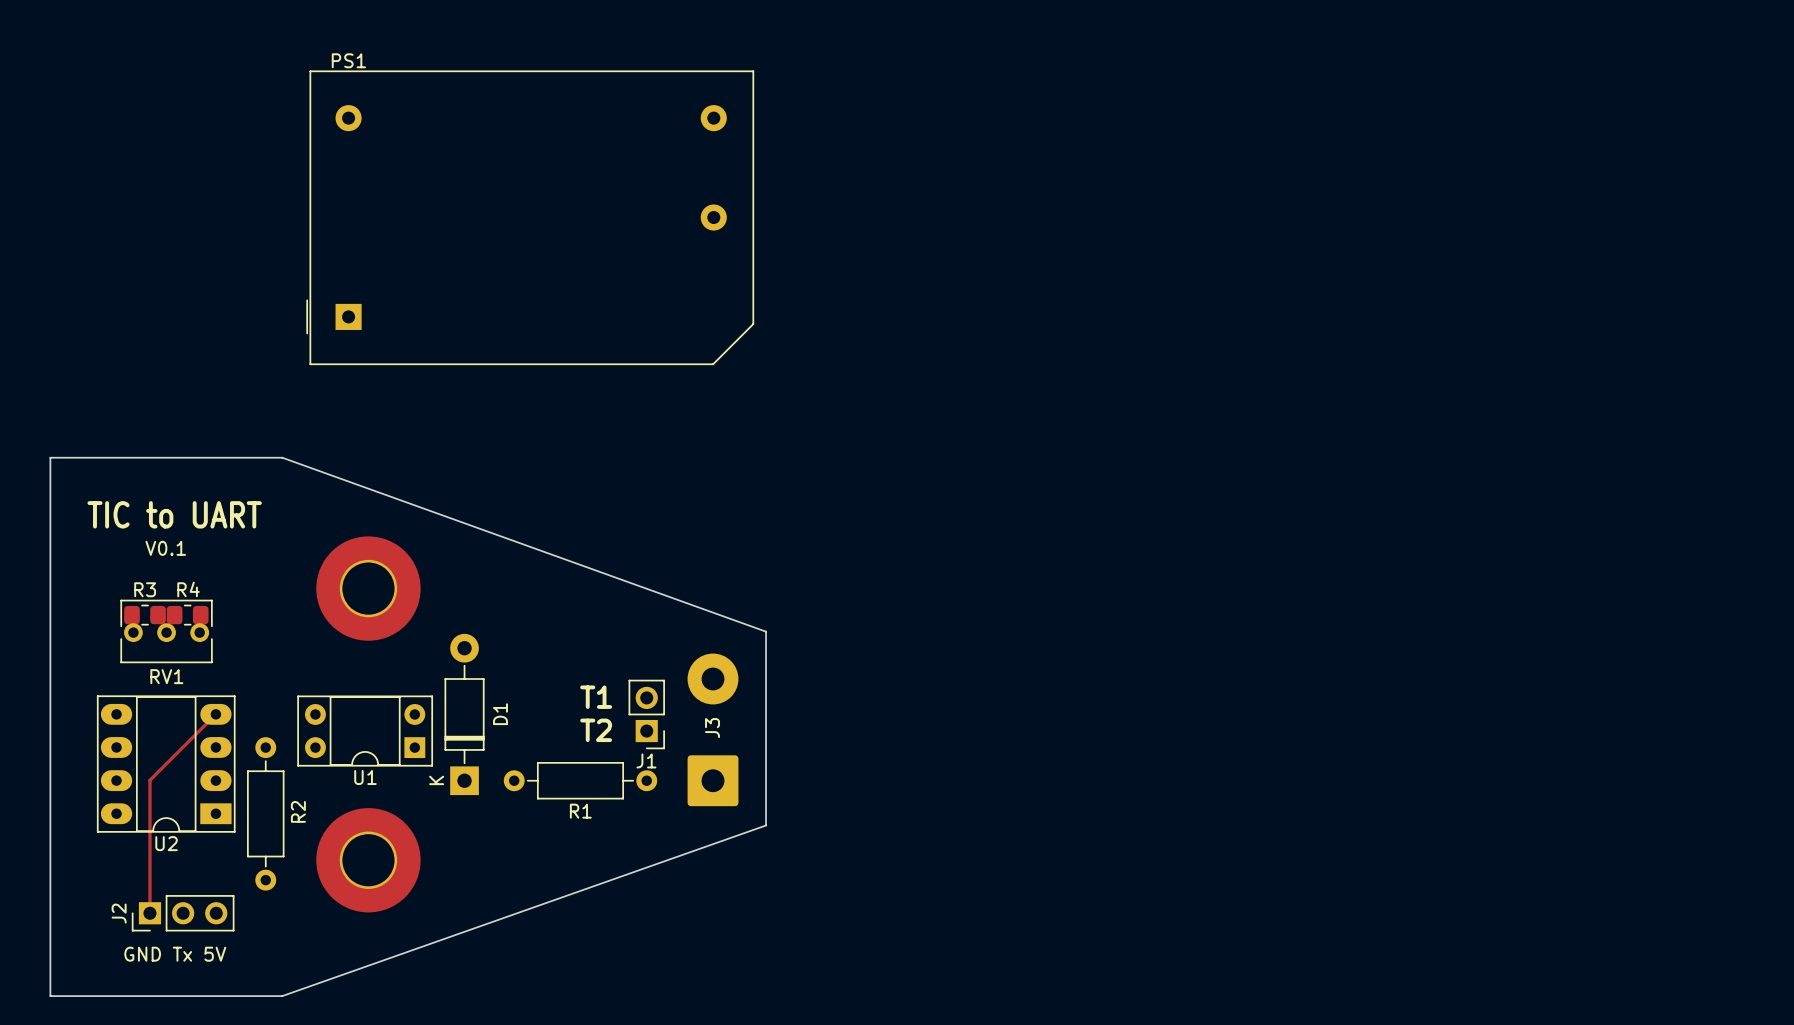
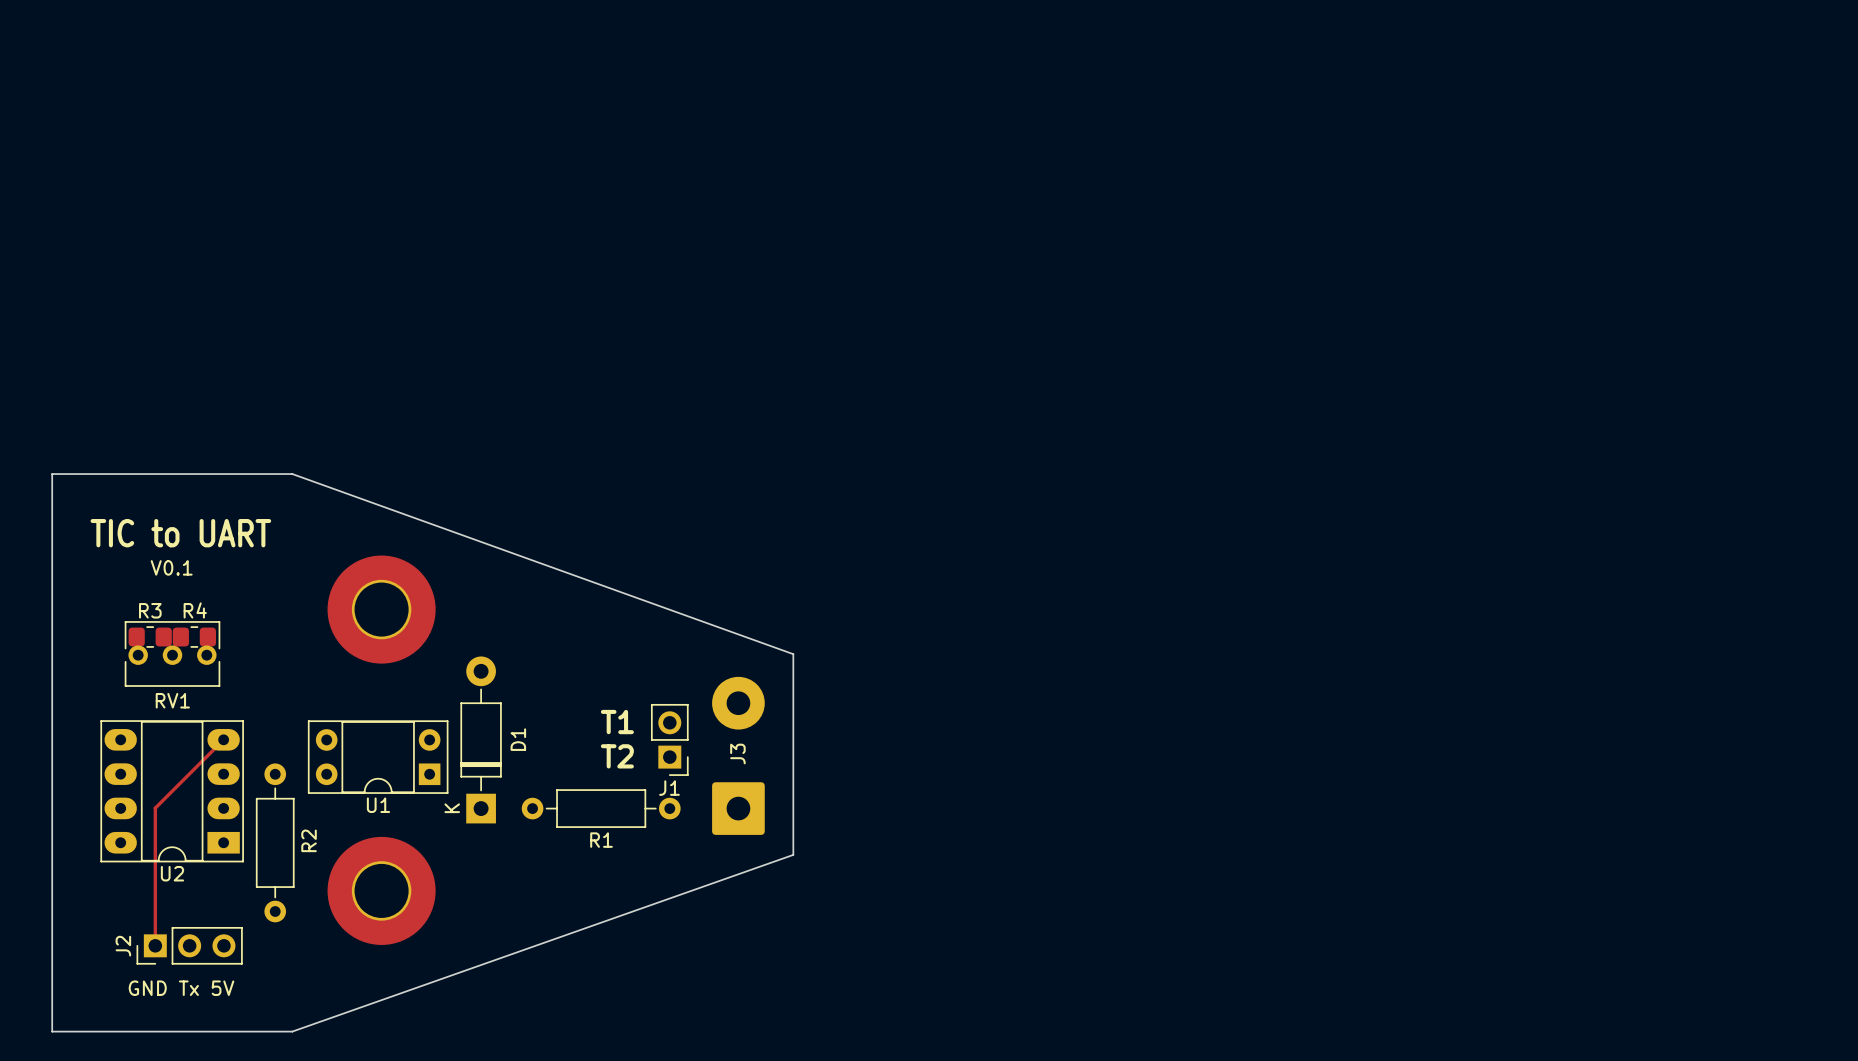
PS1: (530, 217) -> none

